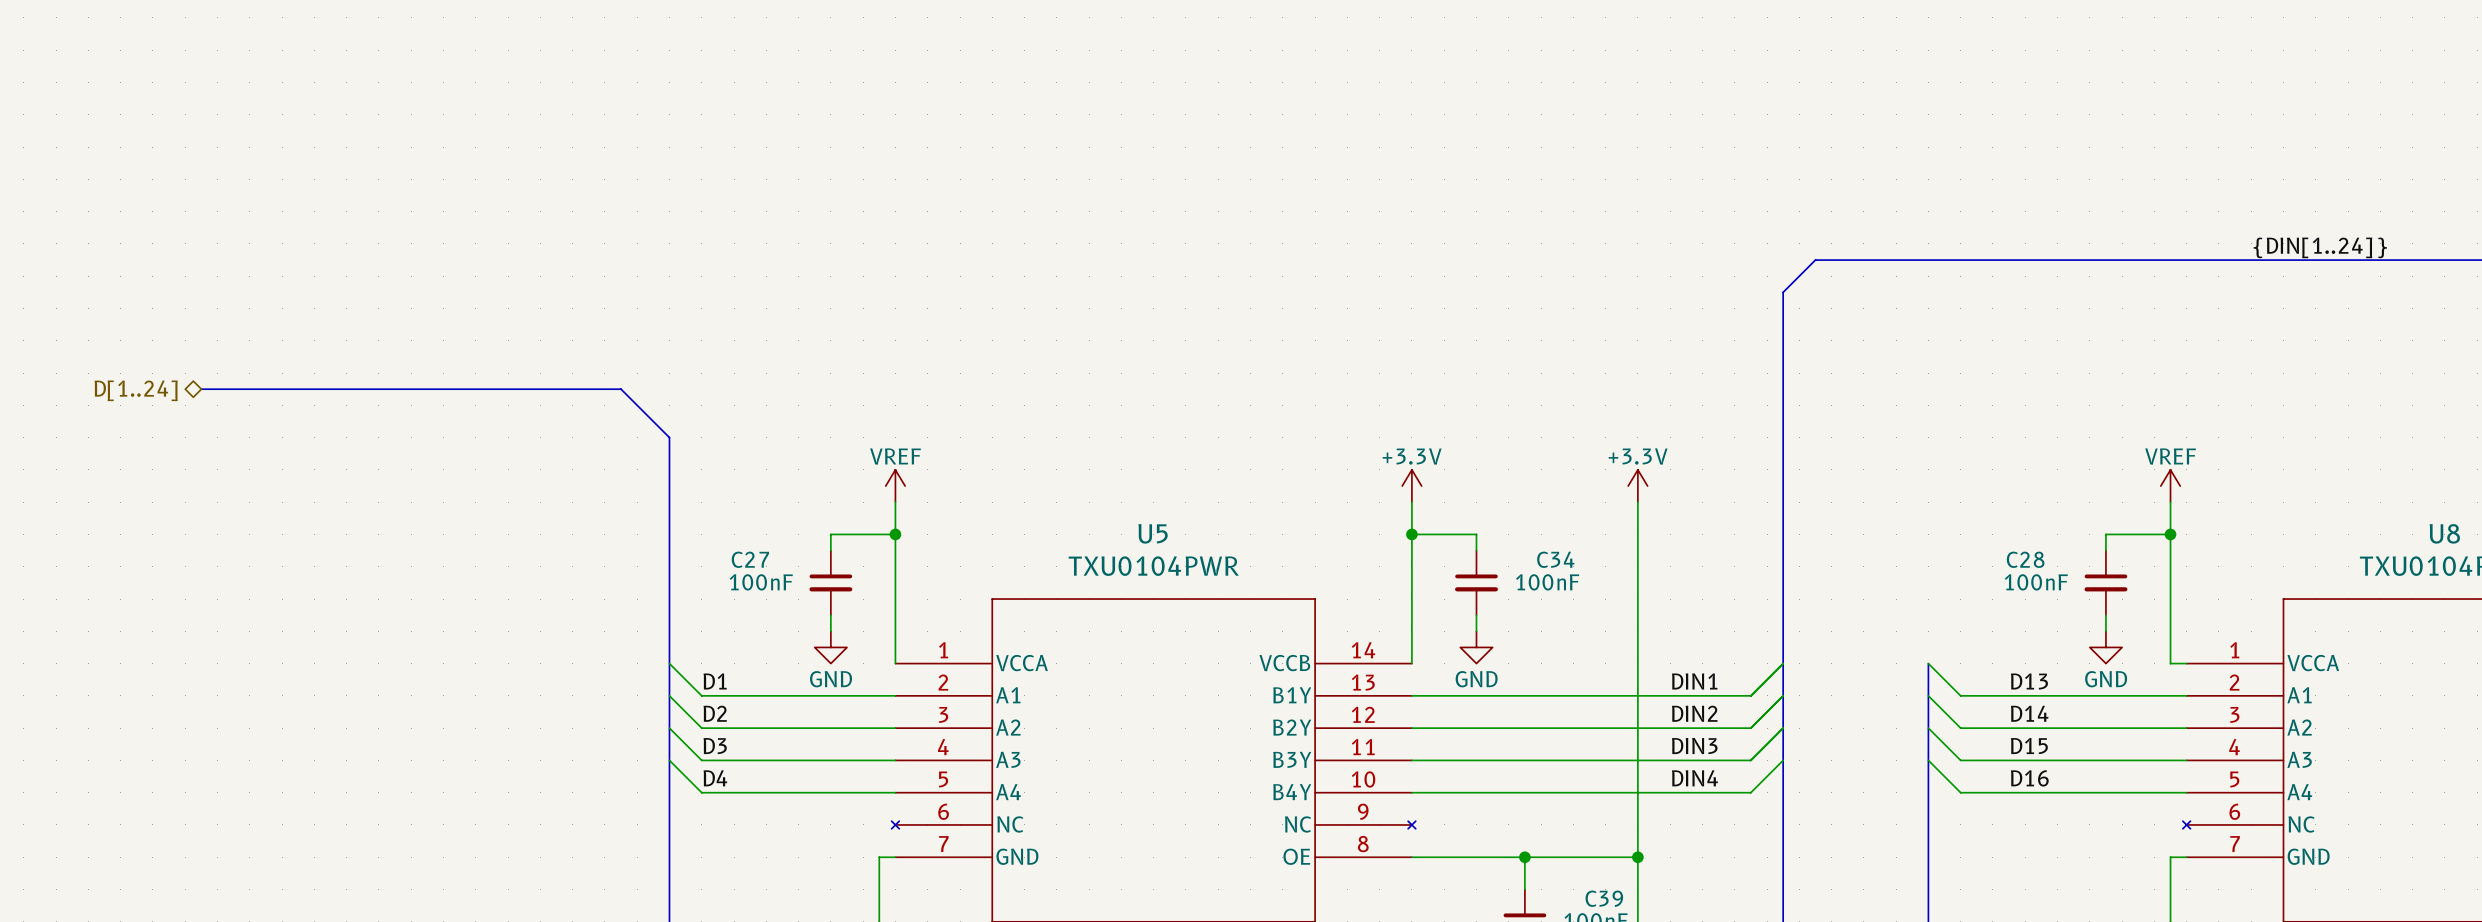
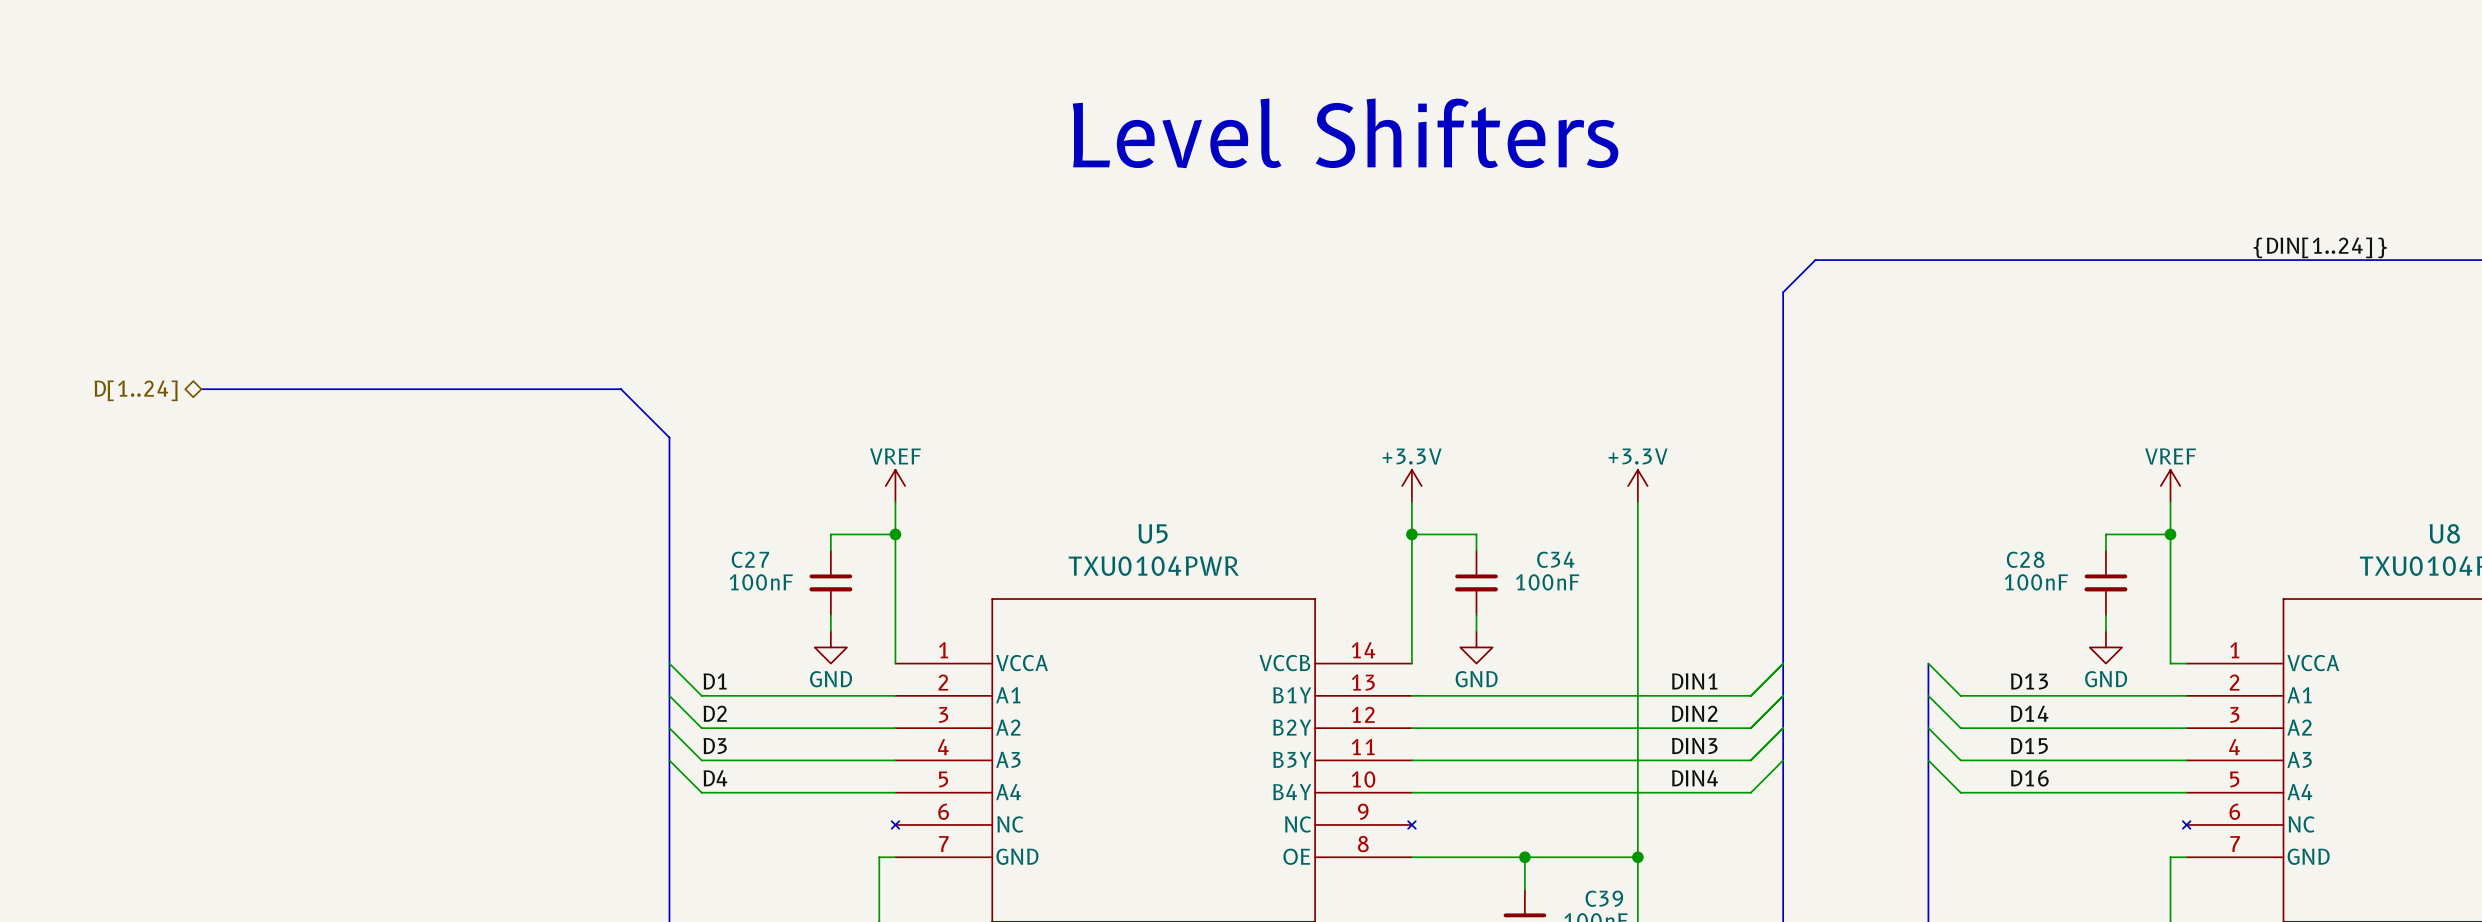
text: none -> Level Shifters (1345, 133)

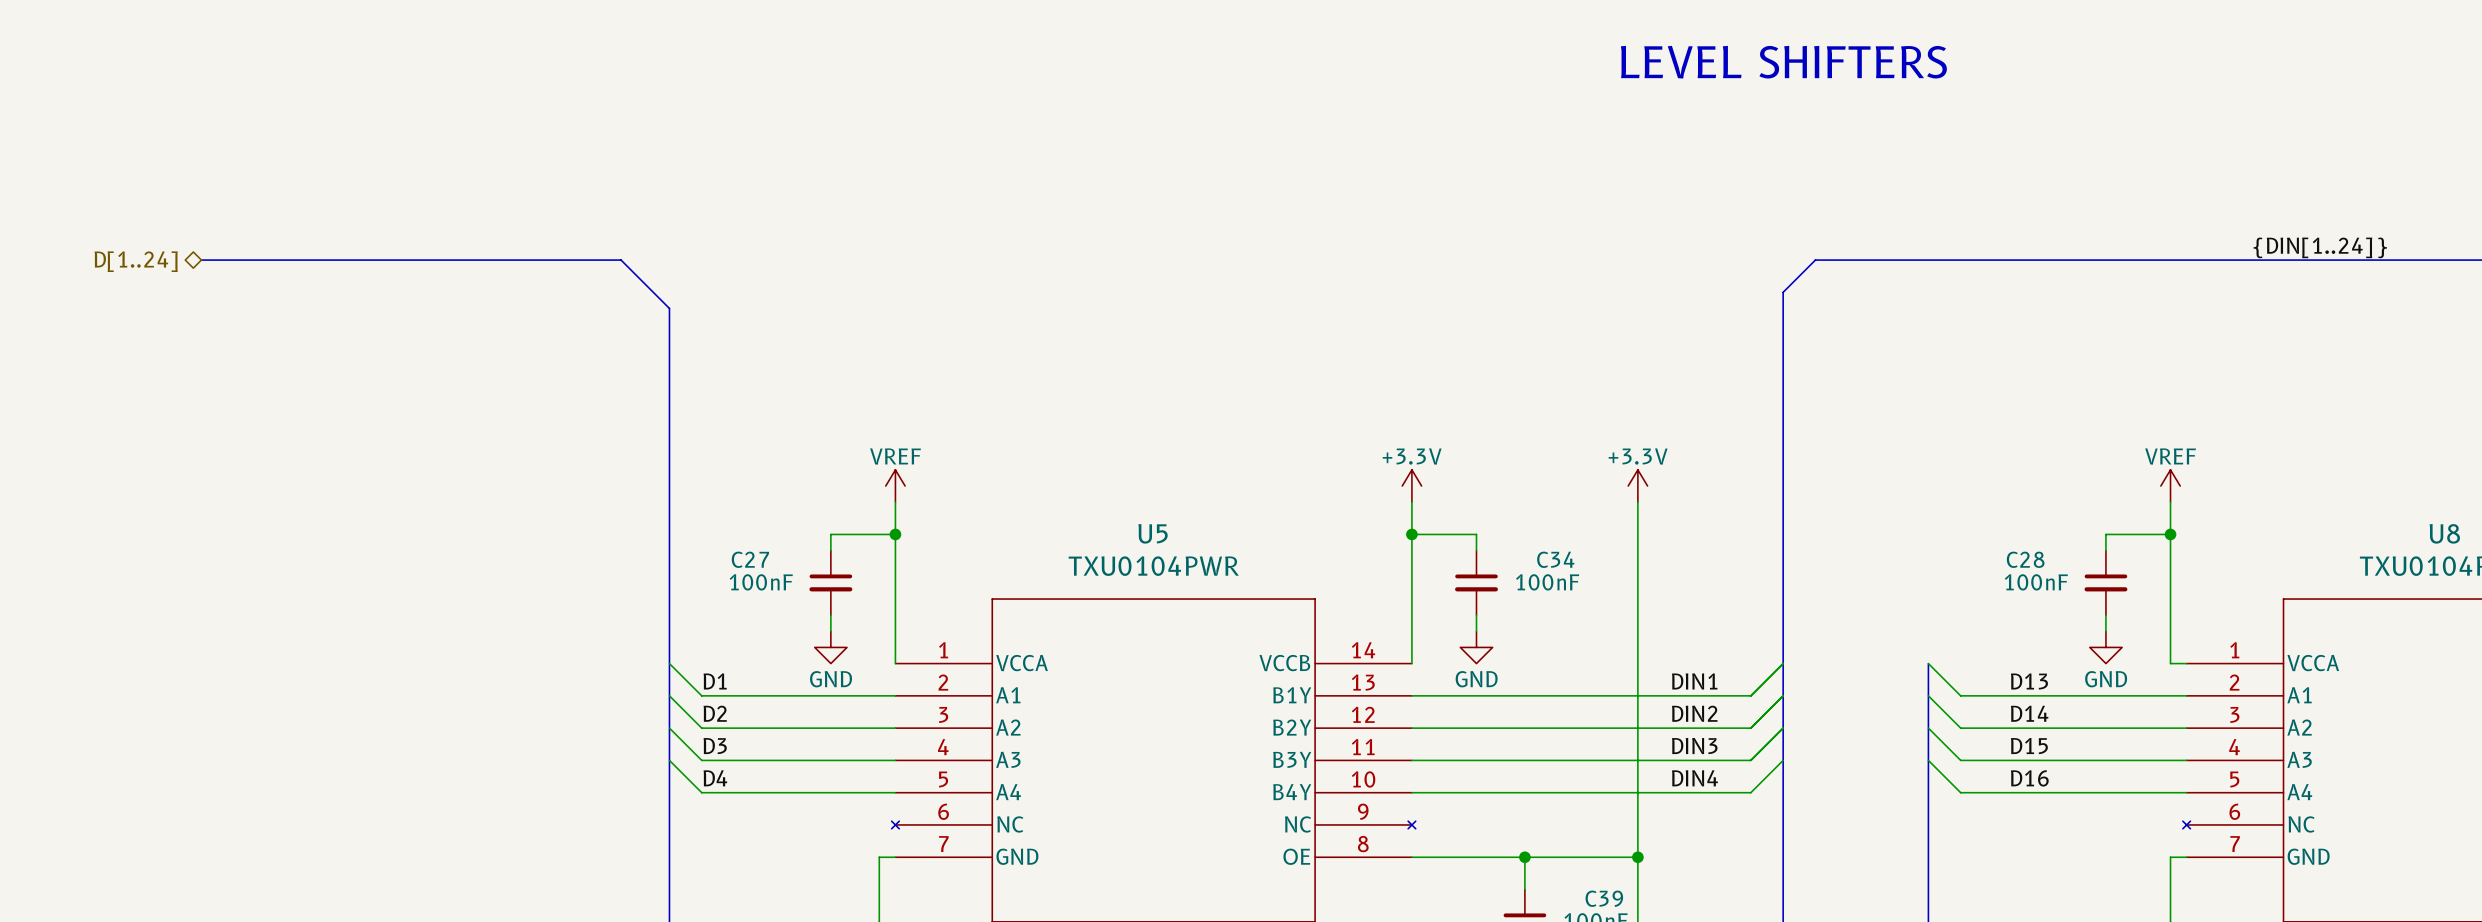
text: none -> LEVEL SHIFTERS (1783, 62)
text: Level Shifters (1345, 133) -> none
bus: (201, 389) (621, 389) (669, 437) -> (201, 260) (621, 260) (669, 308) (669, 437)
hierarchical label position: D[1..24] (136, 390) -> D[1..24] (136, 261)

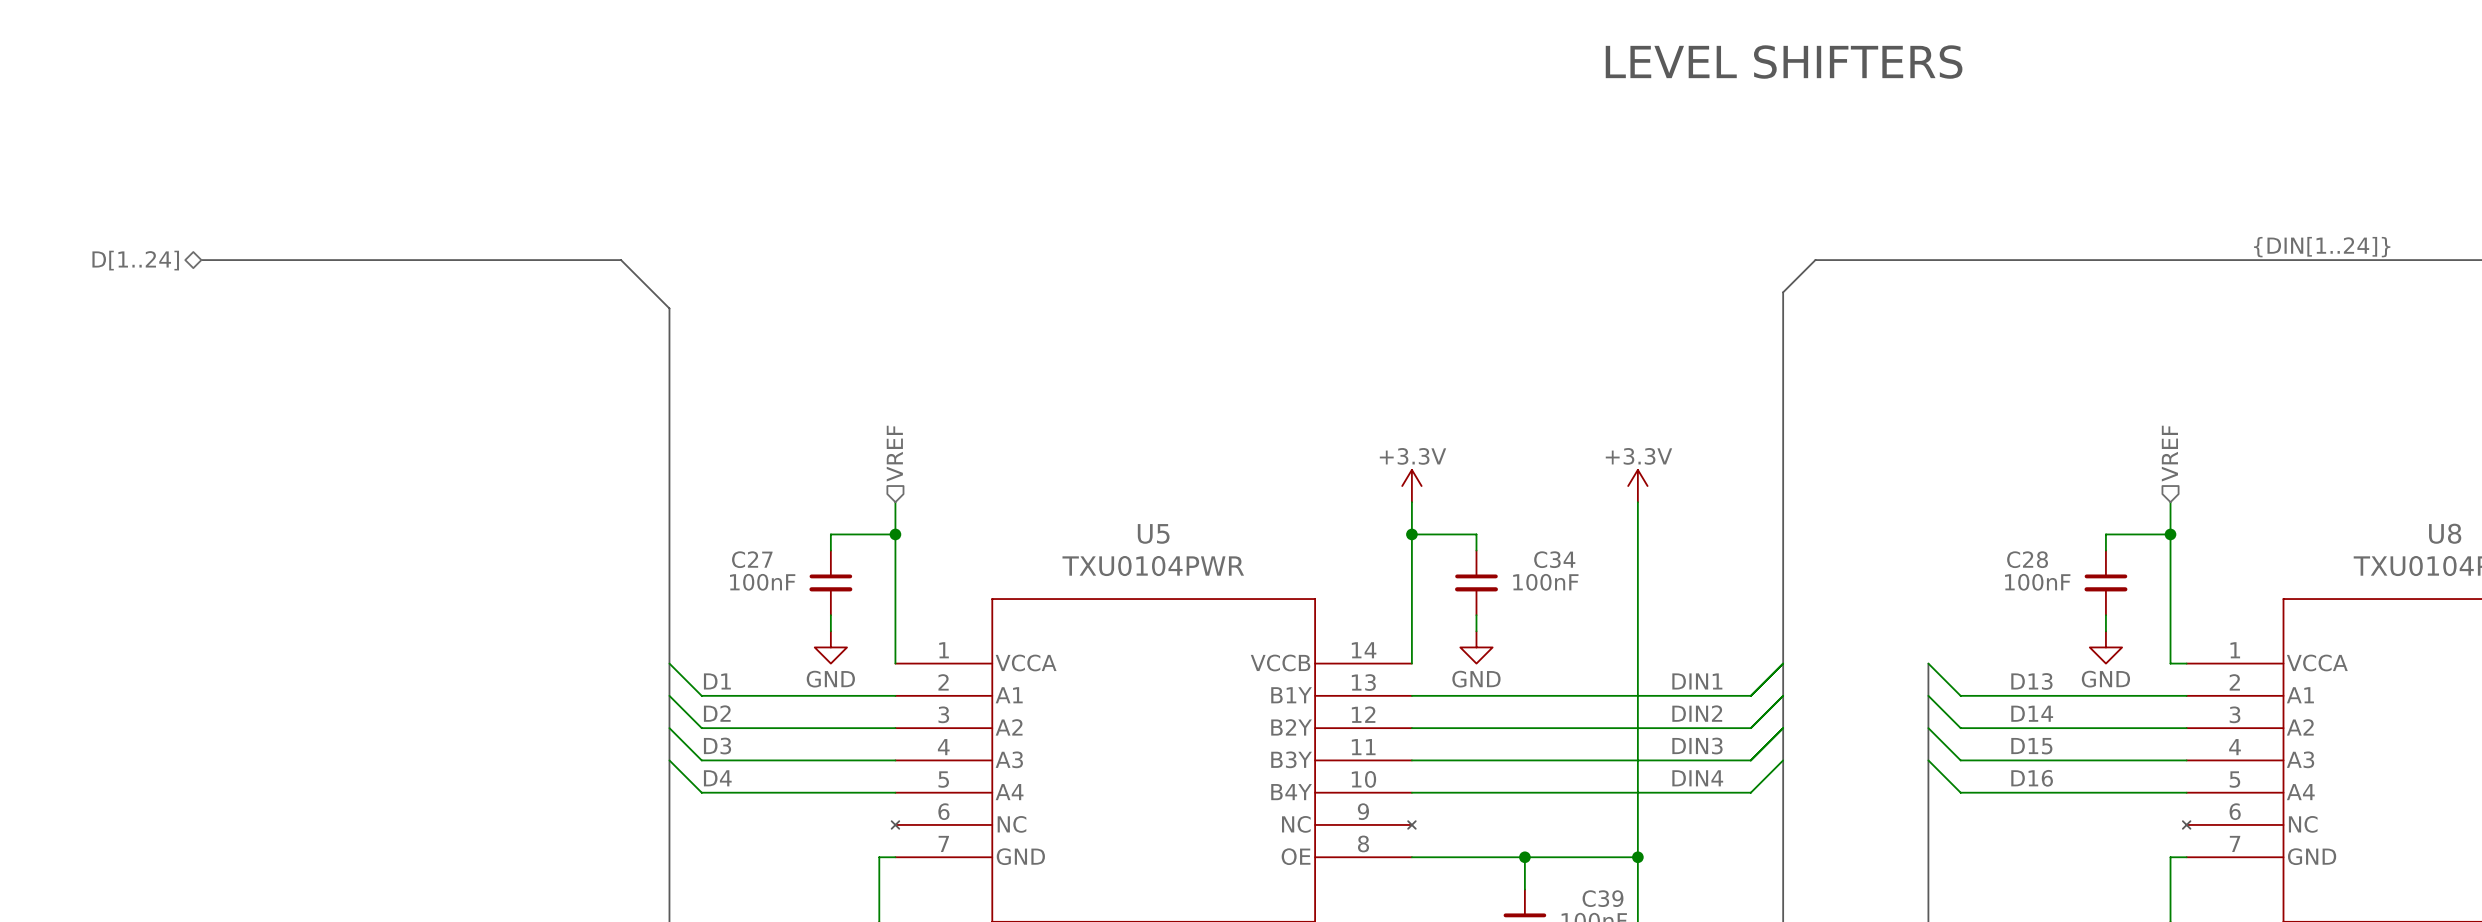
hierarchical label: none -> VREF (894, 453)
hierarchical label: none -> VREF (2169, 453)
power symbol: VREF (895, 486) -> none
power symbol: VREF (2170, 486) -> none

